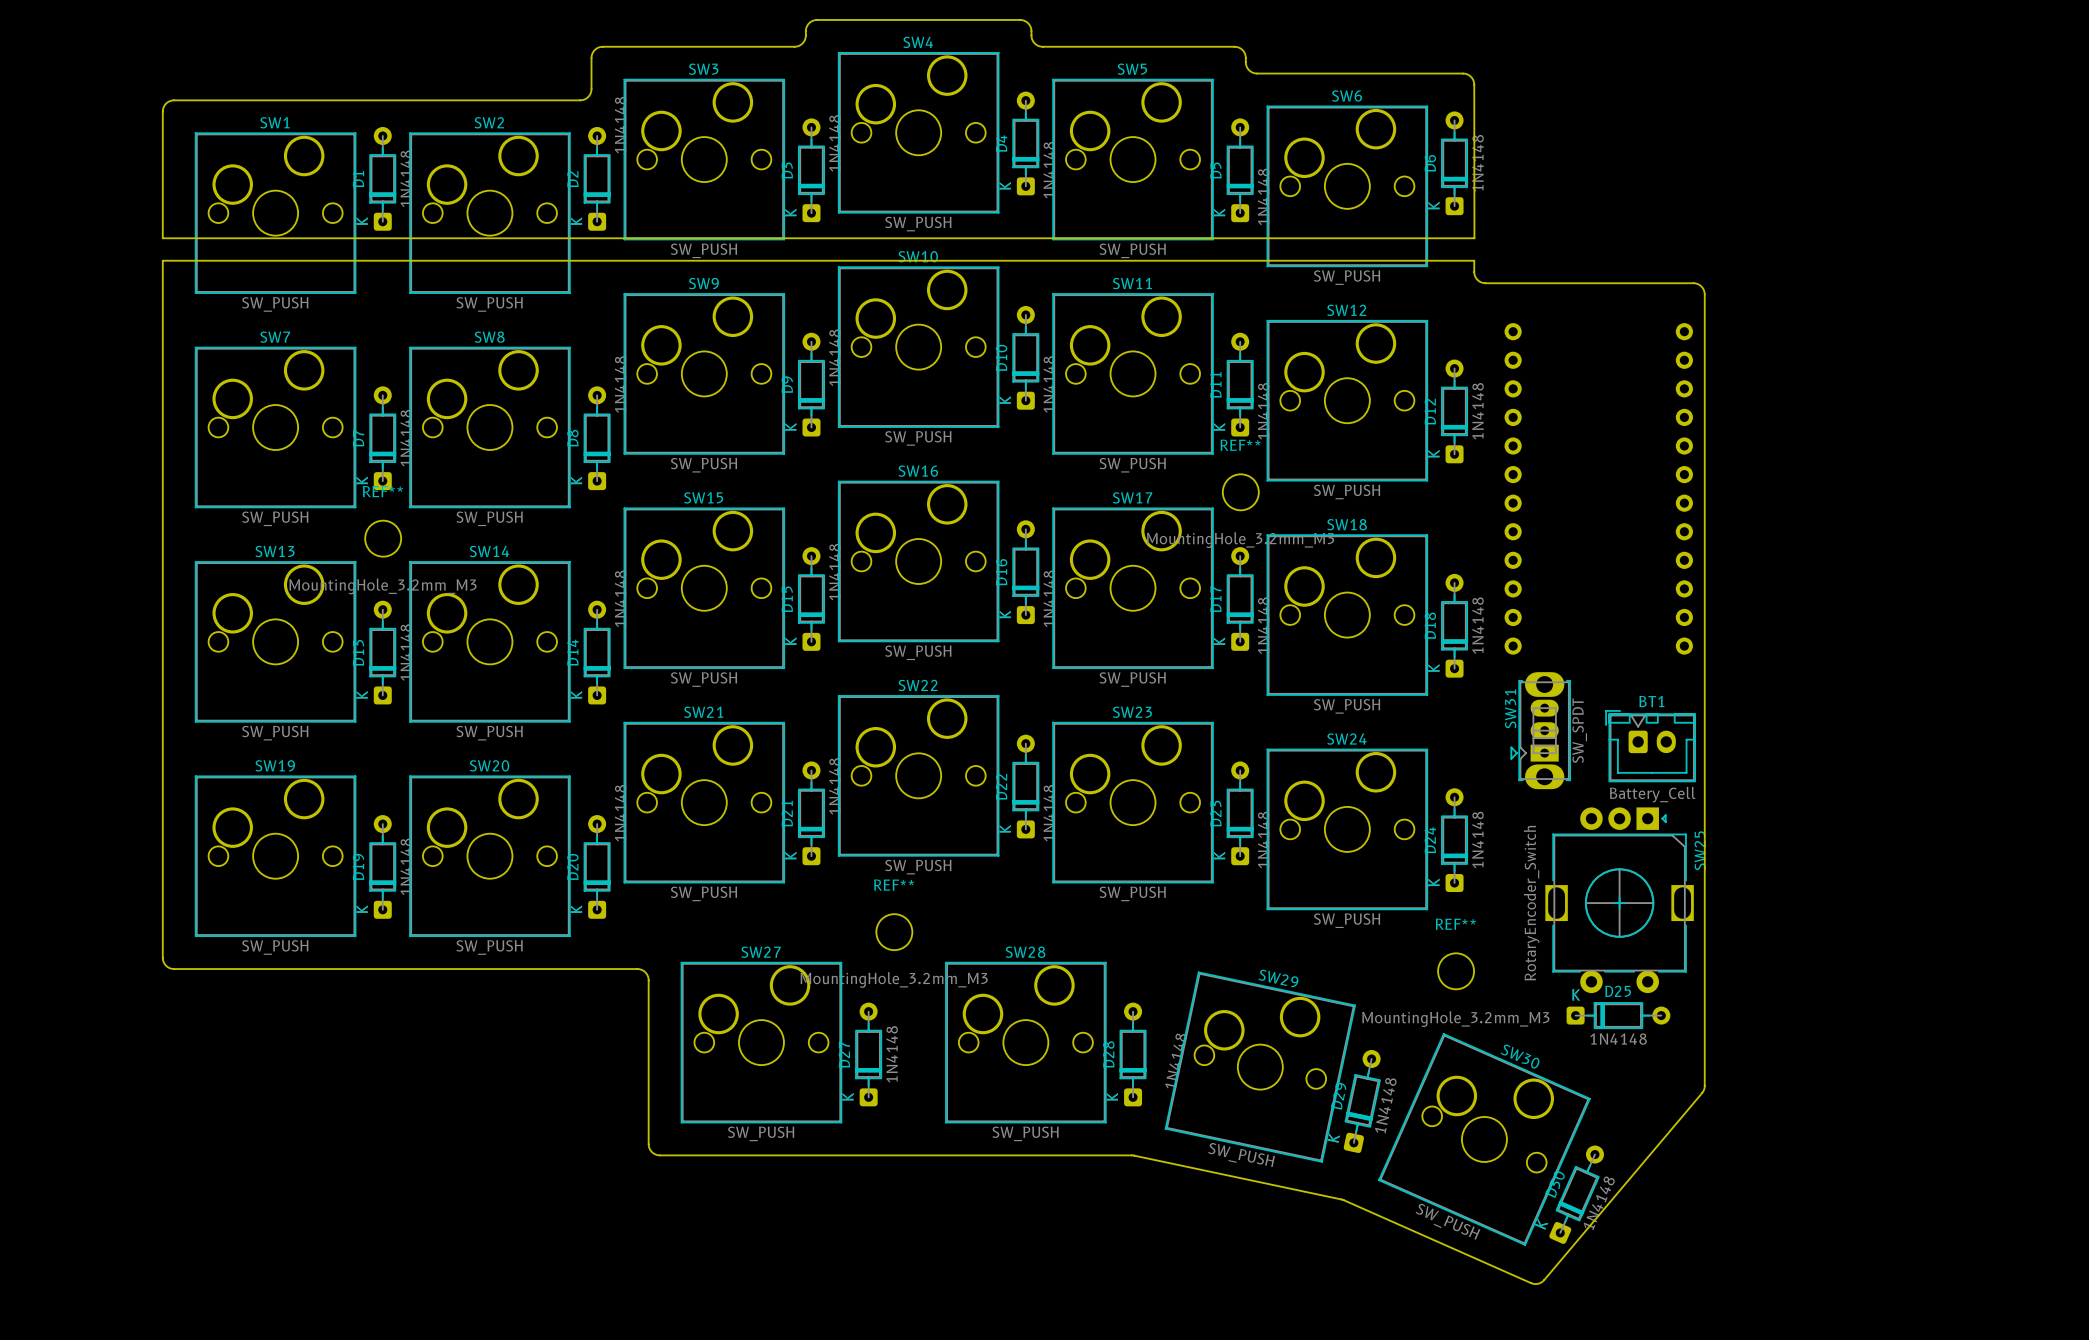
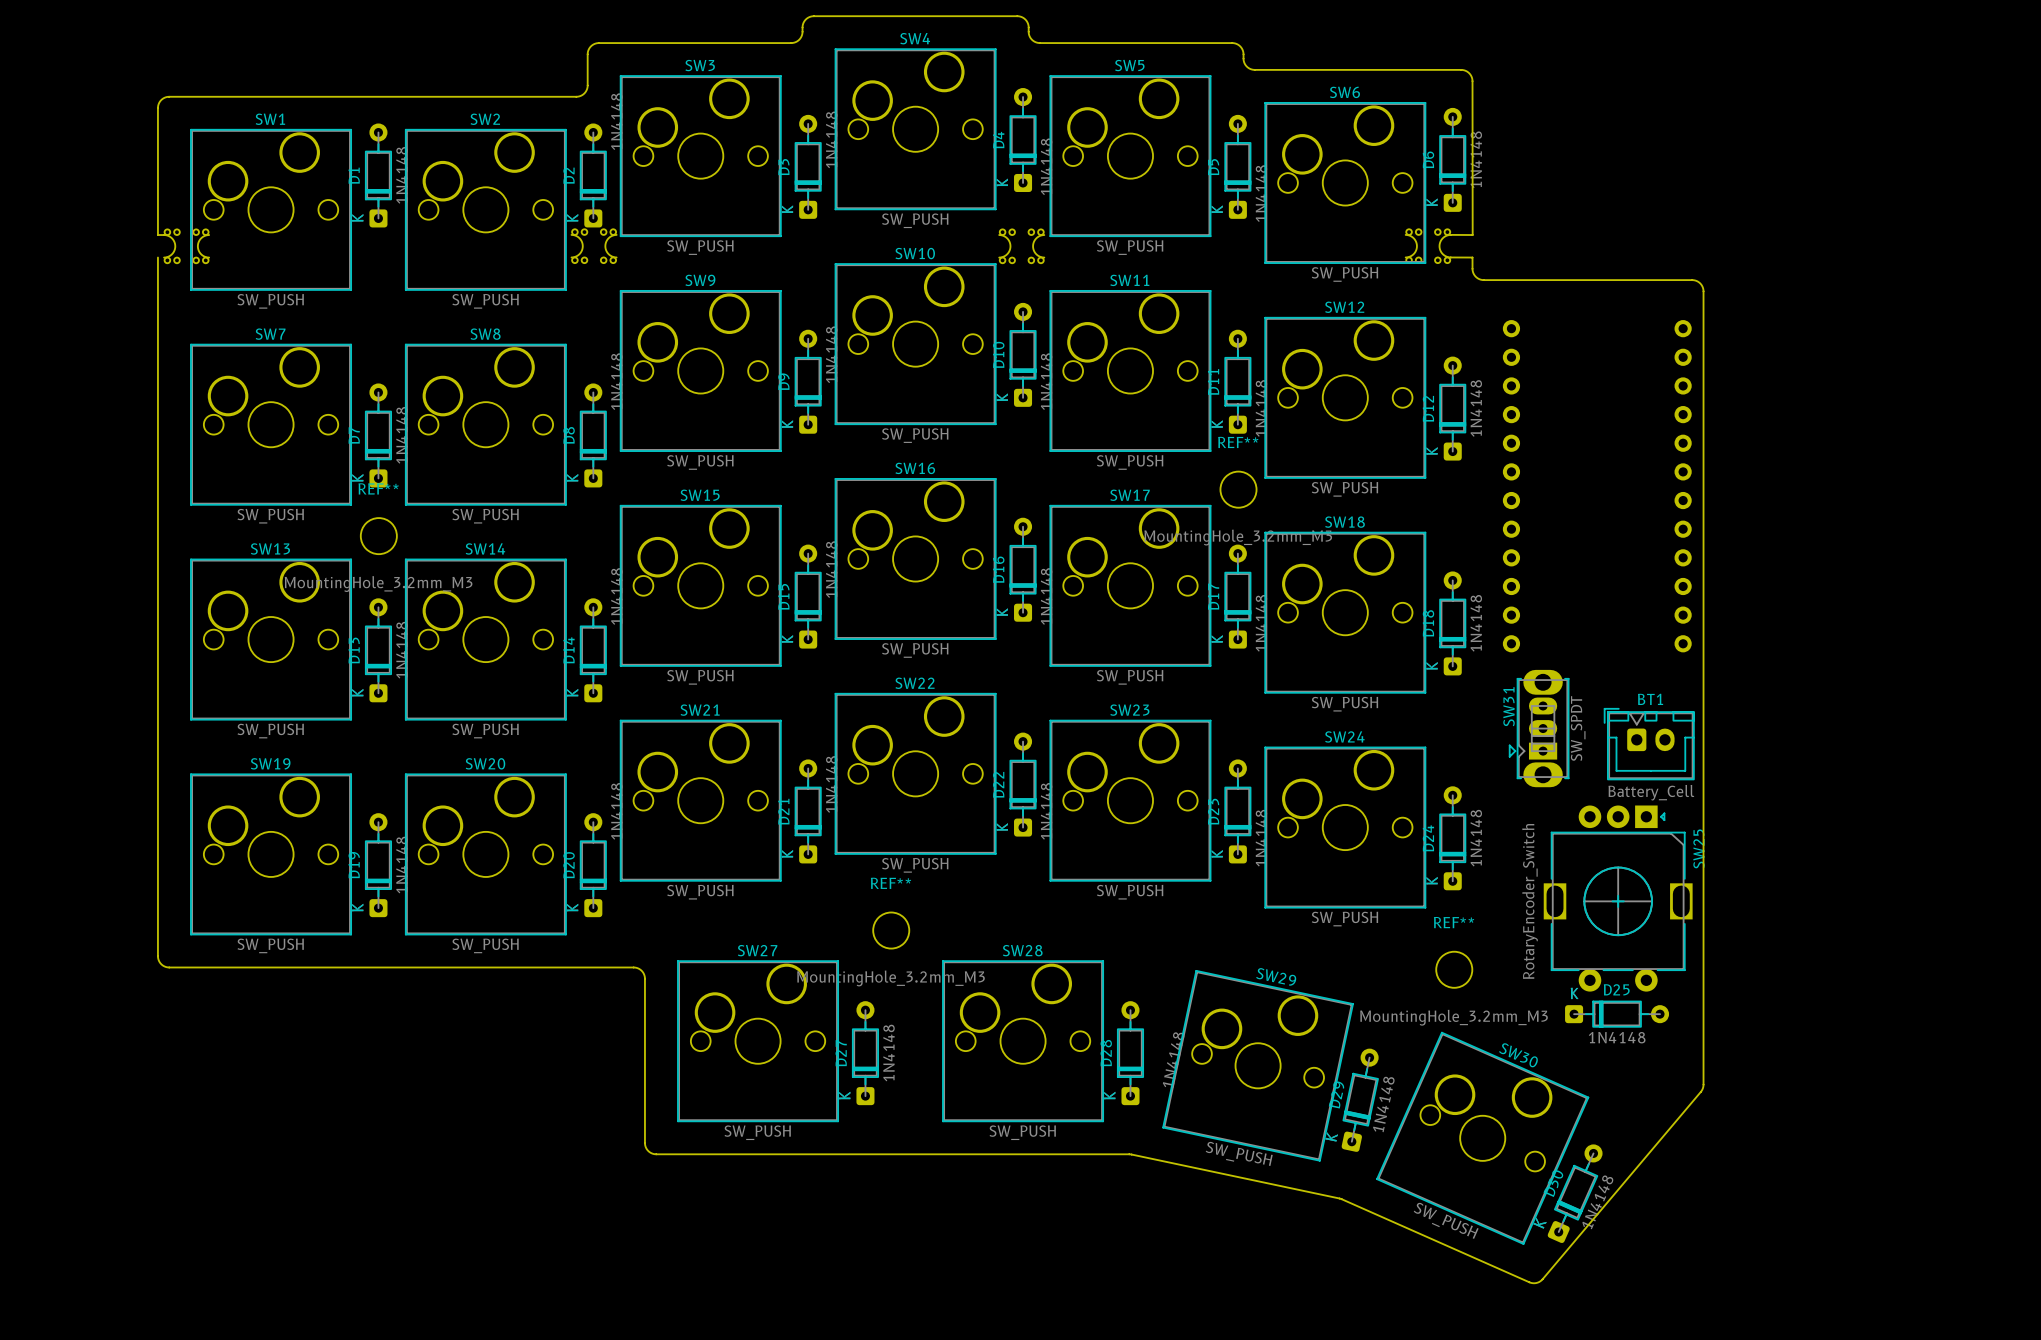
board edge: (168, 238) (1474, 238) -> (1450, 234) (1472, 235)
part: none -> (186, 246)
part: none -> (594, 246)
part: none -> (1021, 246)
part: none -> (1428, 246)
board edge: (162, 260) (1474, 260) -> (1450, 257) (1472, 257)

